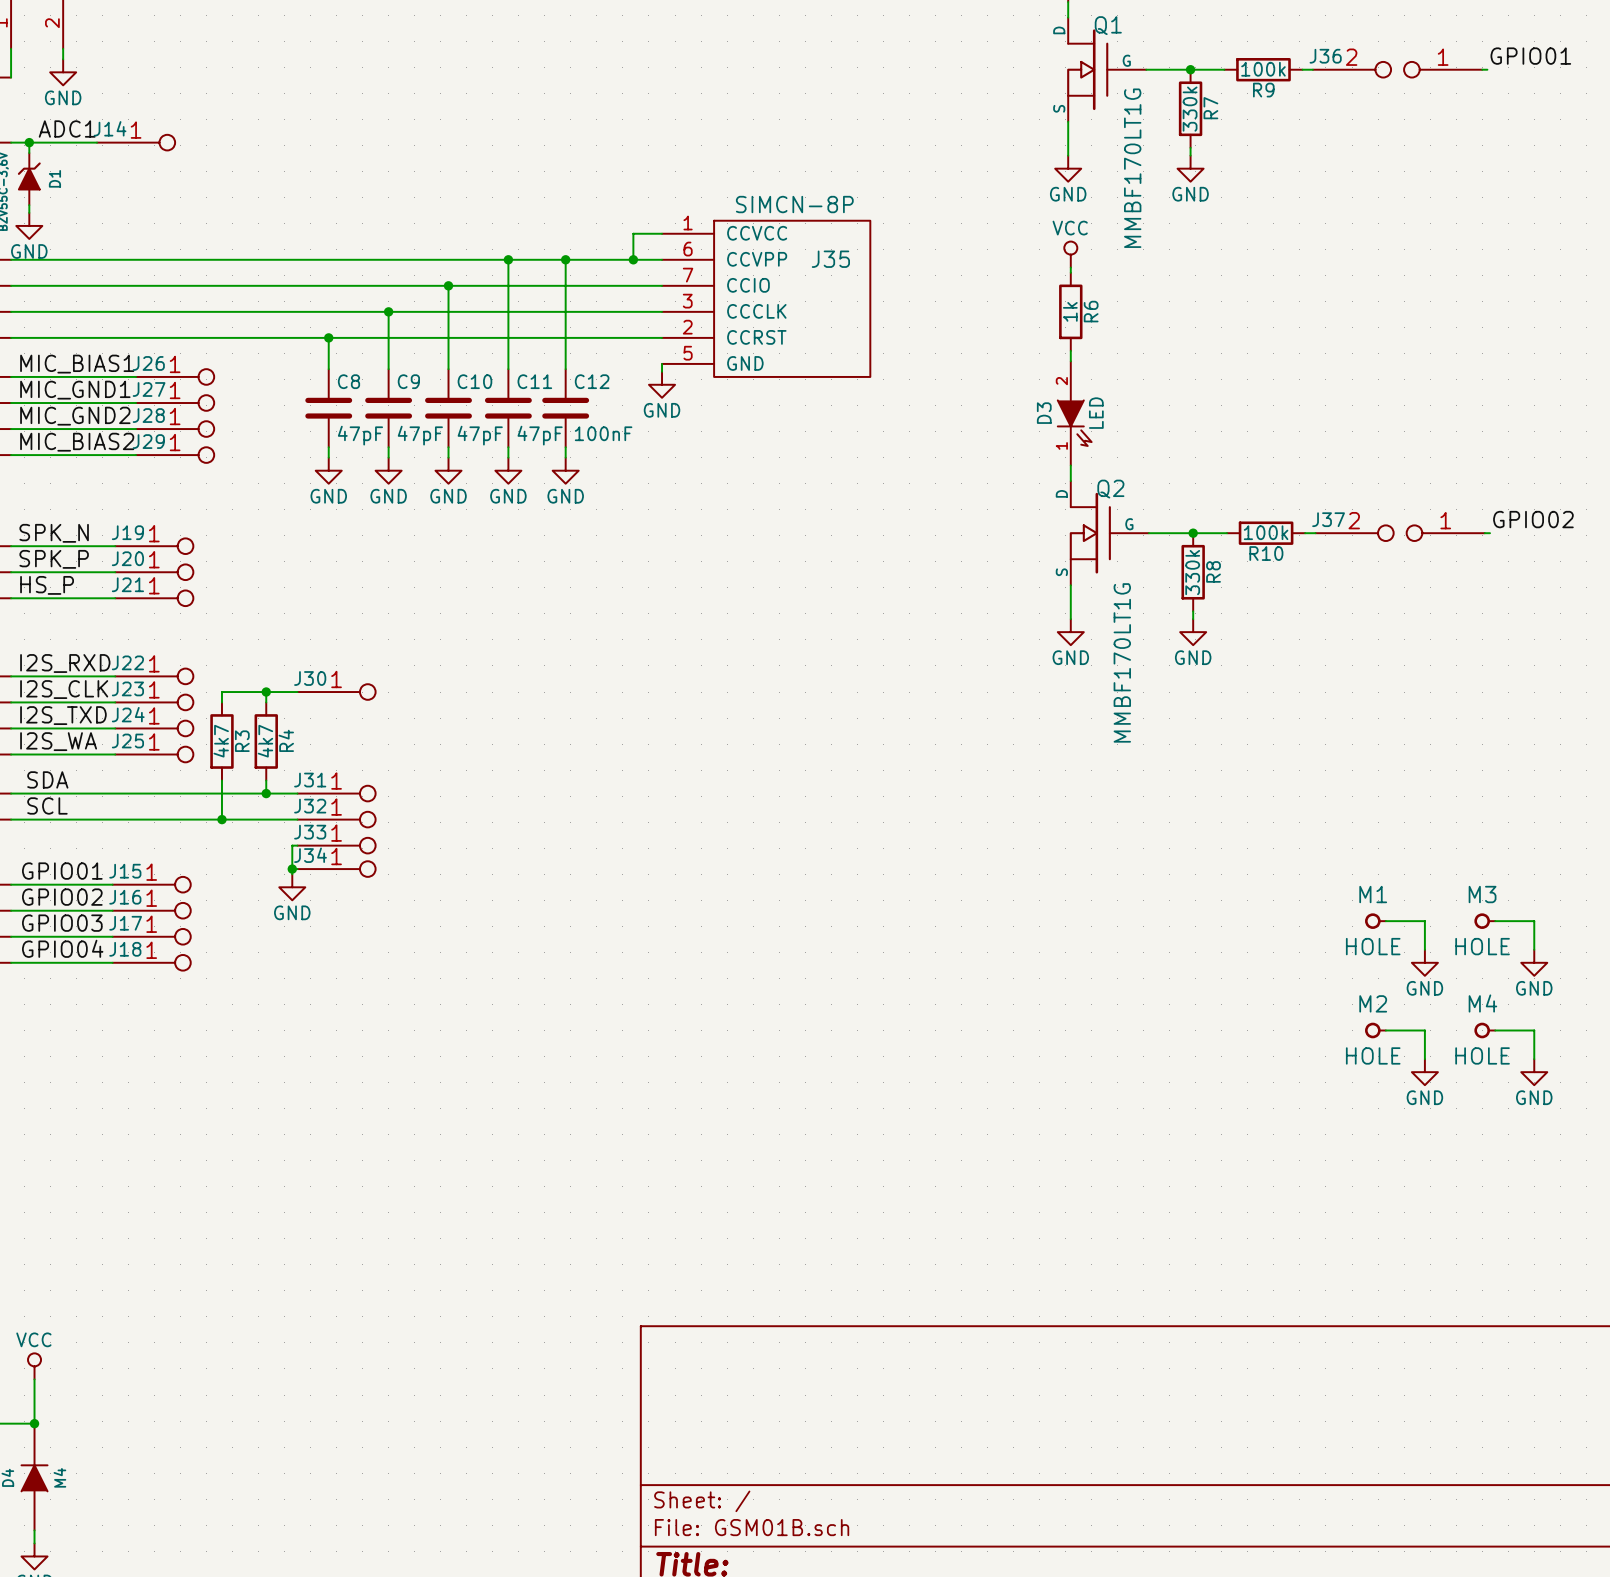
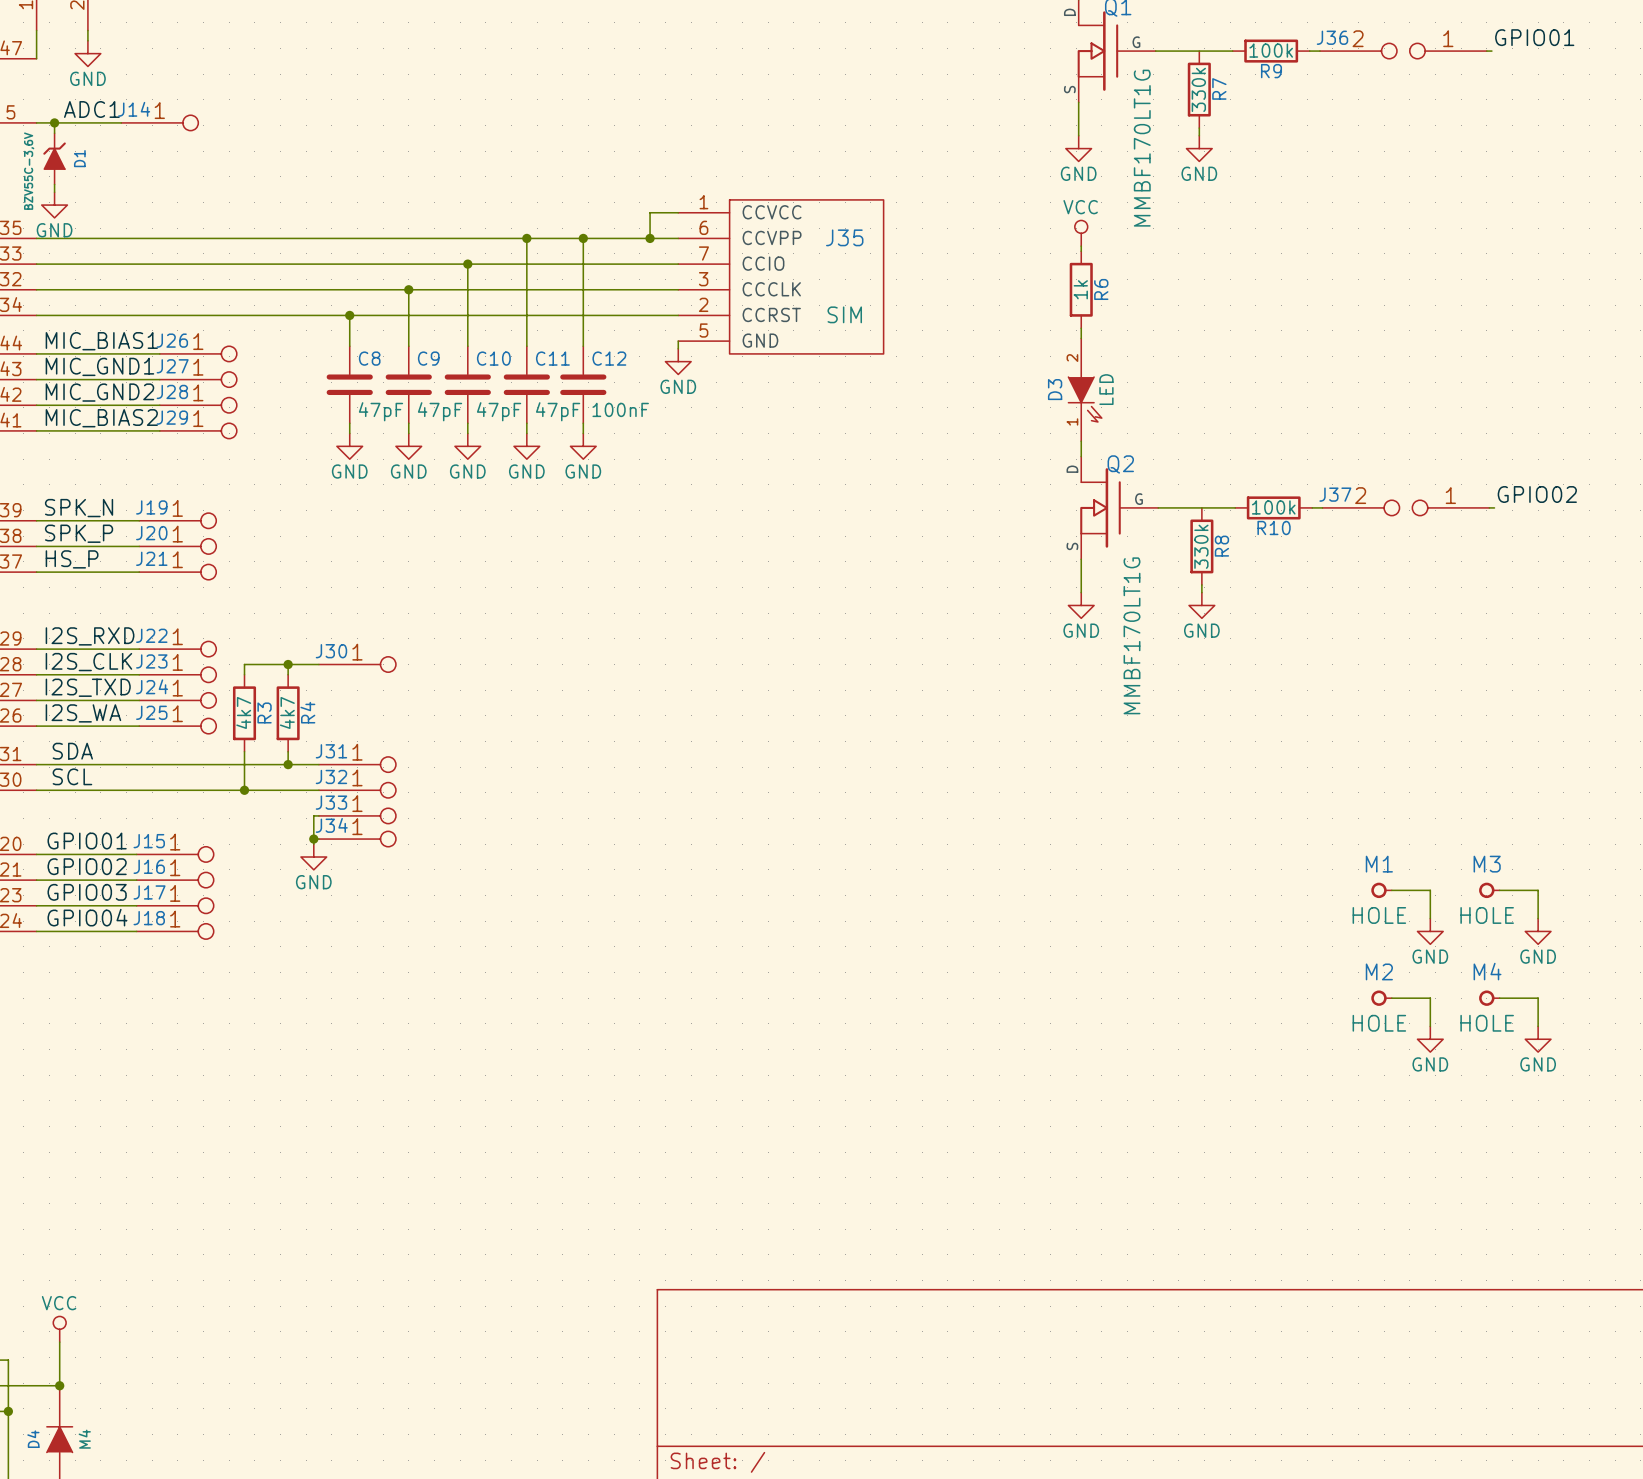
junction: (1190, 69) -> none
J35 value: SIMCN-8P (794, 204) -> SIM (844, 314)
junction: (1193, 533) -> none

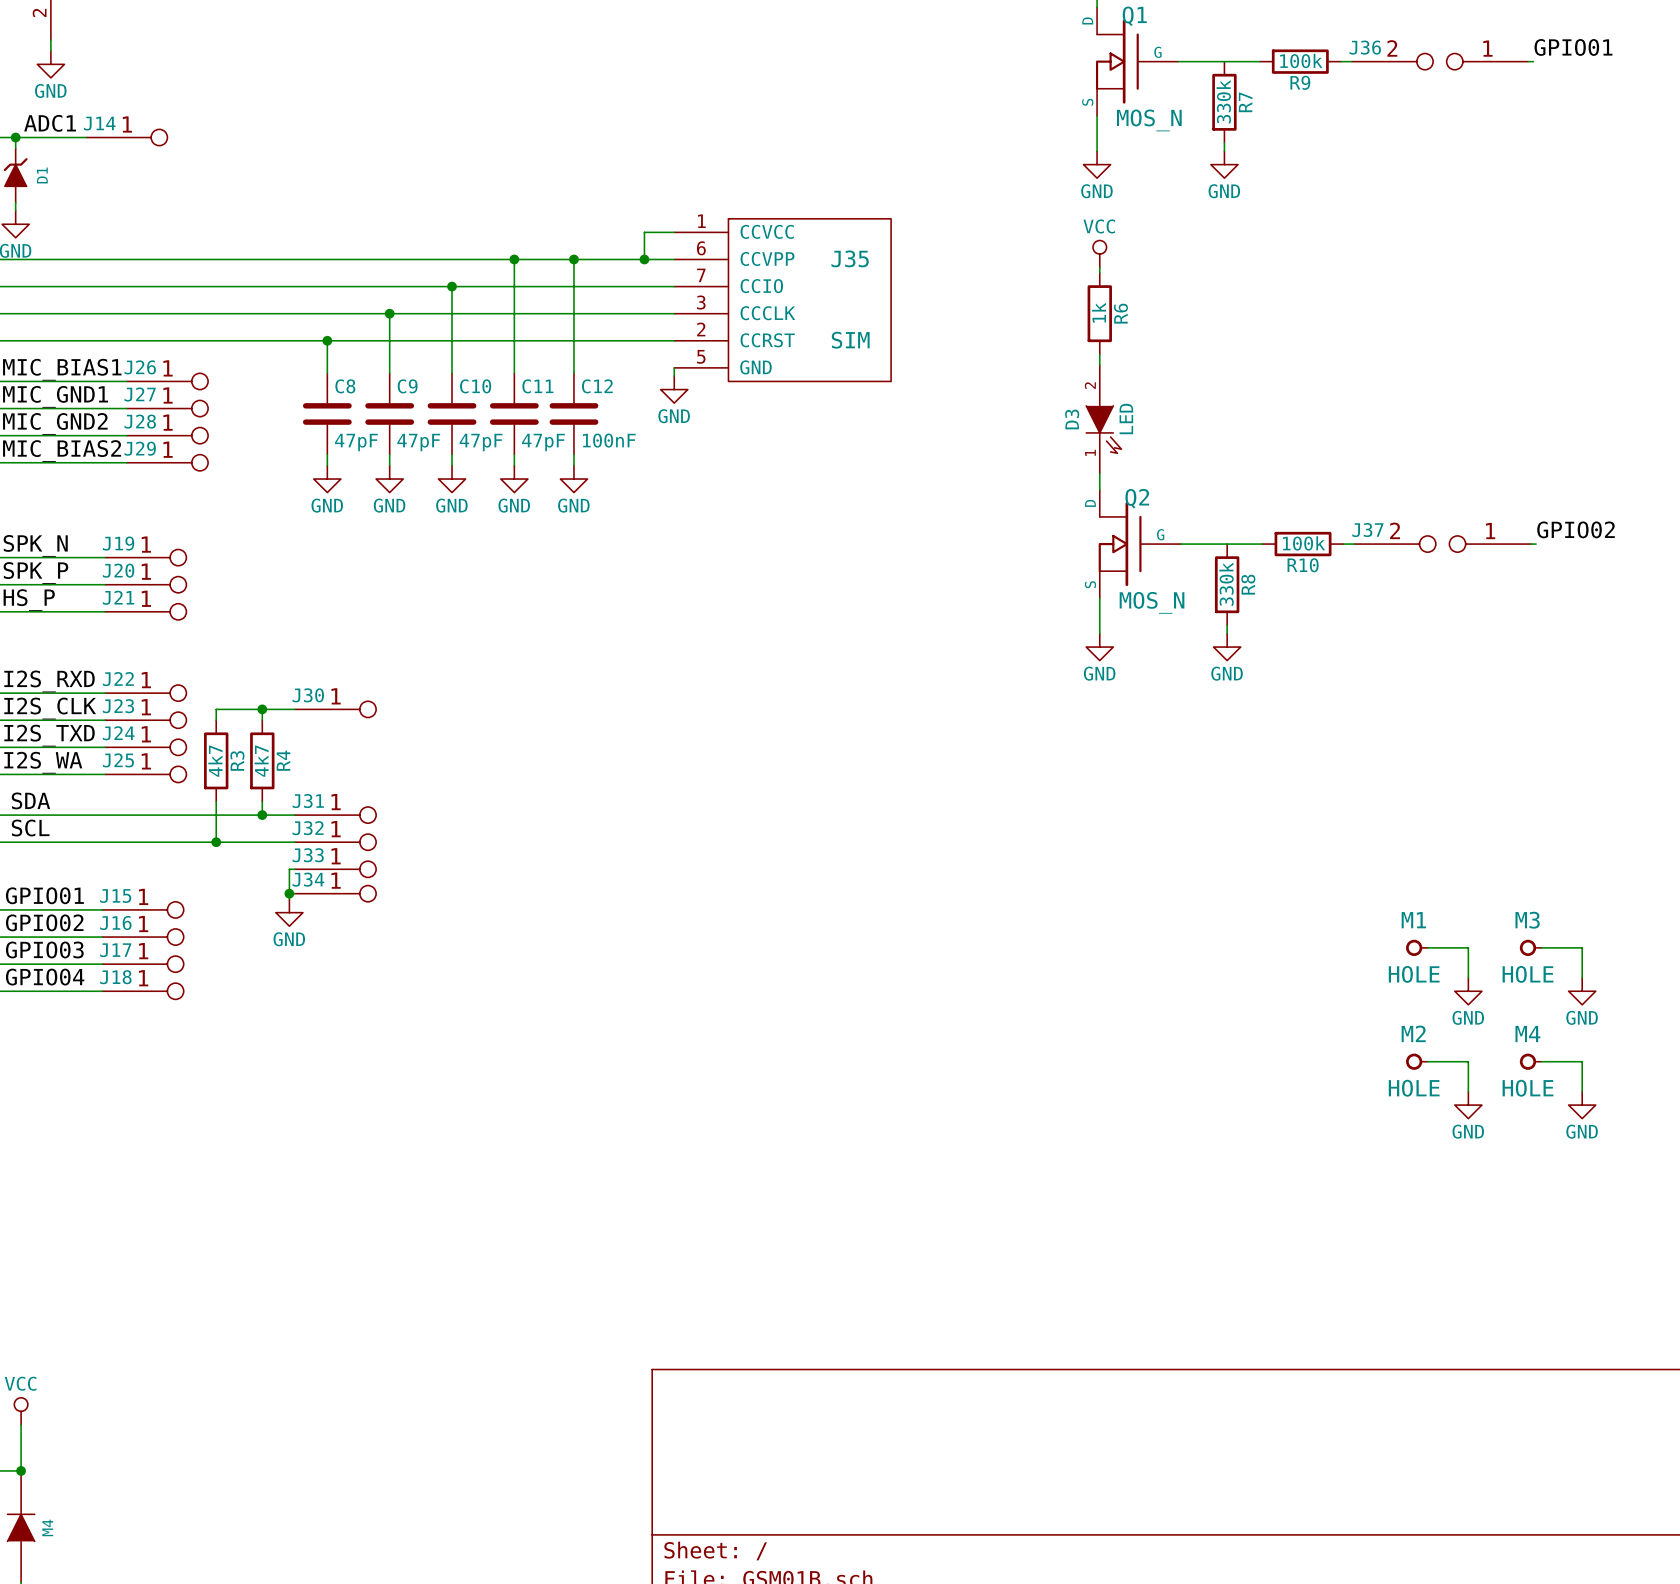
Q1 value: MMBF170LT1G (1142, 148) -> MOS_N (1149, 120)
Q2 value: MMBF170LT1G (1132, 635) -> MOS_N (1152, 602)

